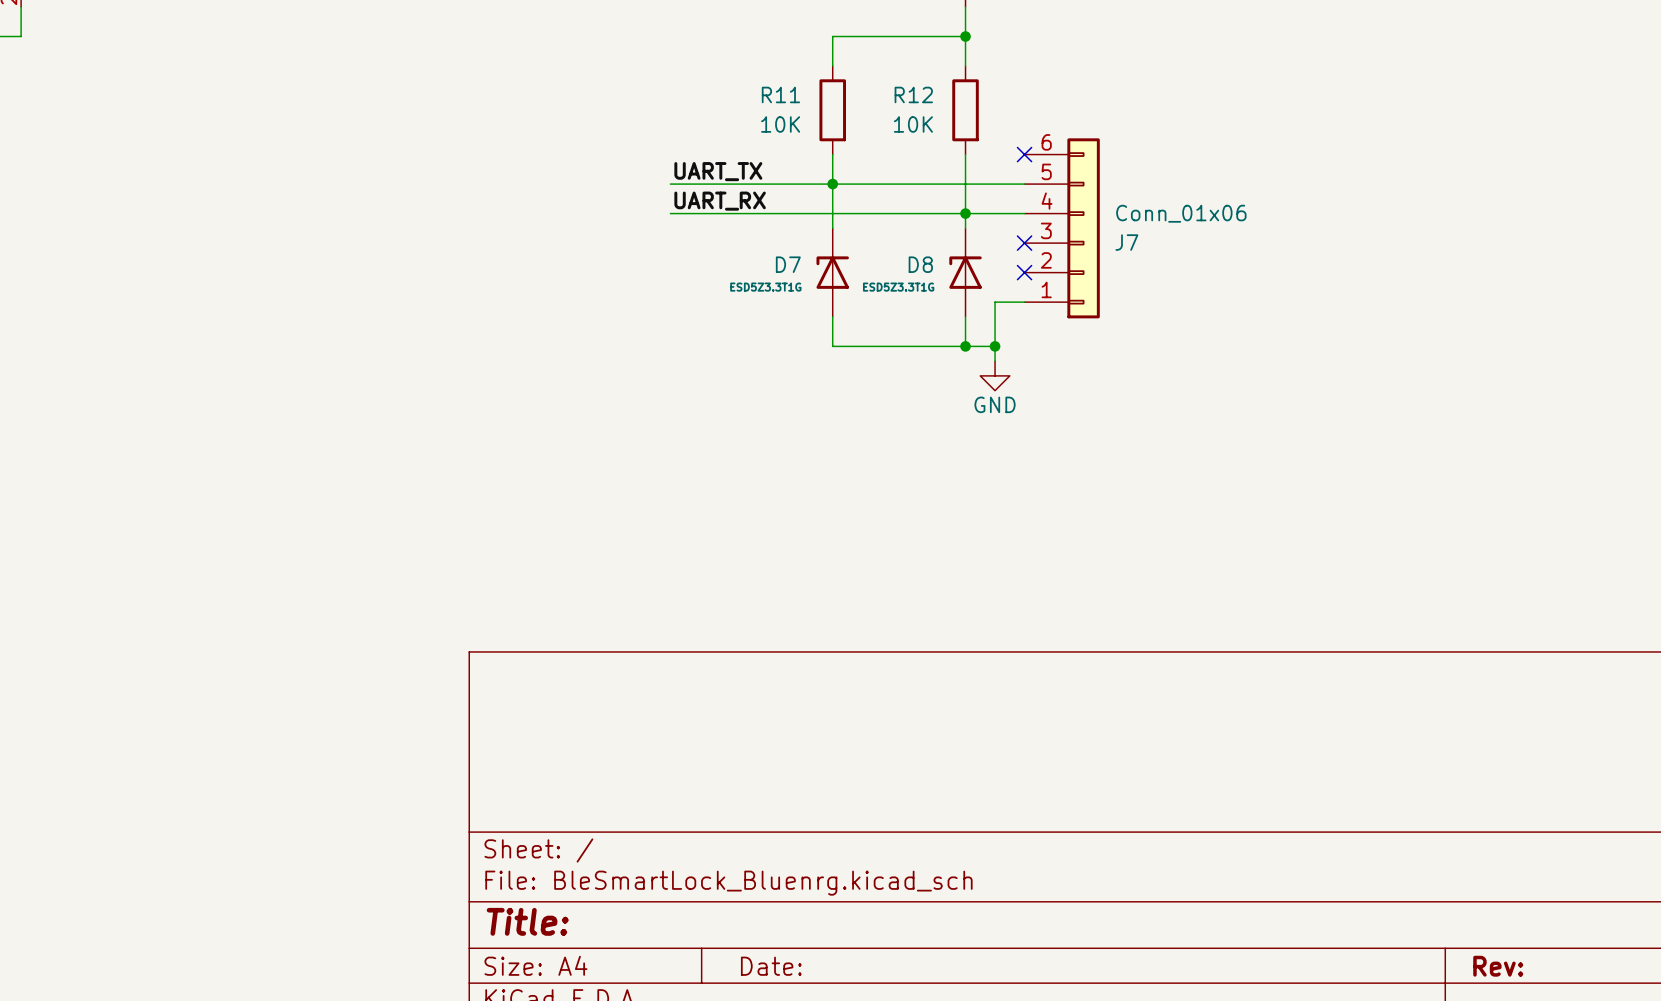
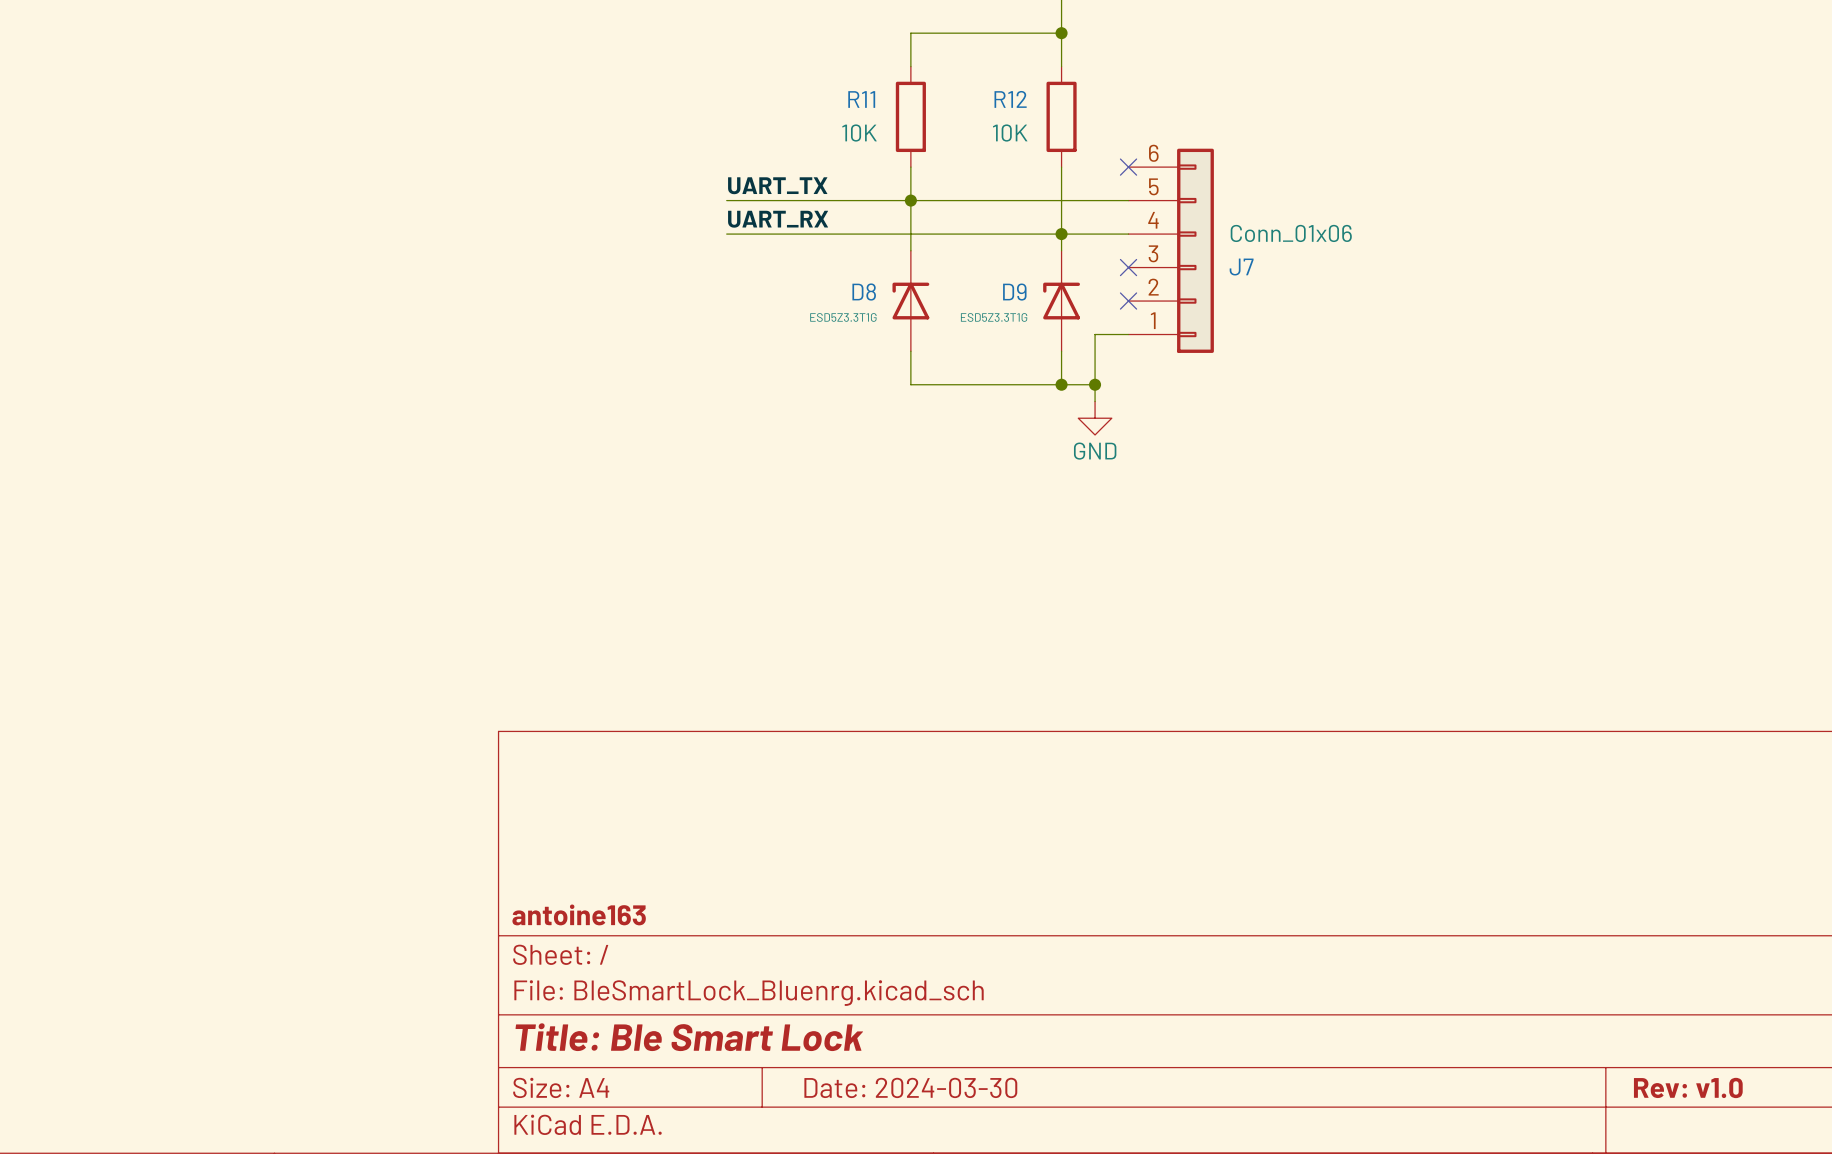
D7 name: D7 (788, 264) -> D8 (864, 292)
D8 name: D8 (920, 264) -> D9 (1014, 292)
title block: none -> antoine163 (579, 914)
title block: Title: (527, 921) -> Title: Ble Smart Lock (689, 1037)
title block: Date: (771, 966) -> Date: 2024-03-30 (910, 1087)
title block: Rev: (1498, 966) -> Rev: v1.0 (1688, 1087)

